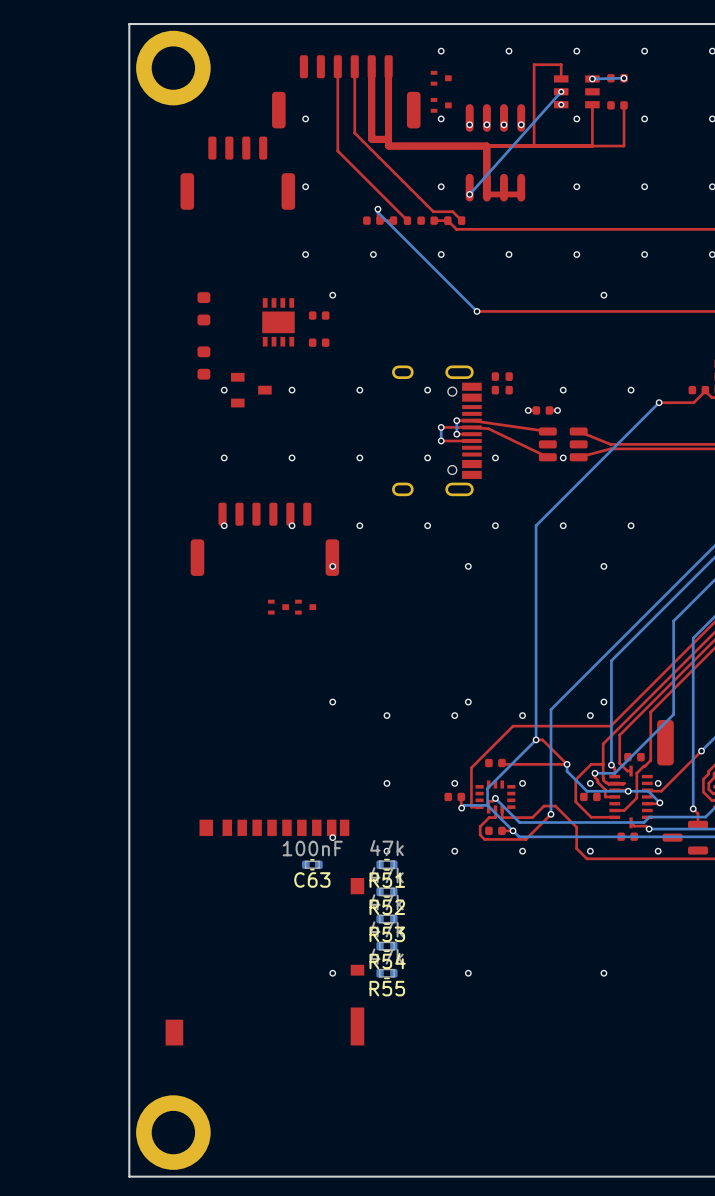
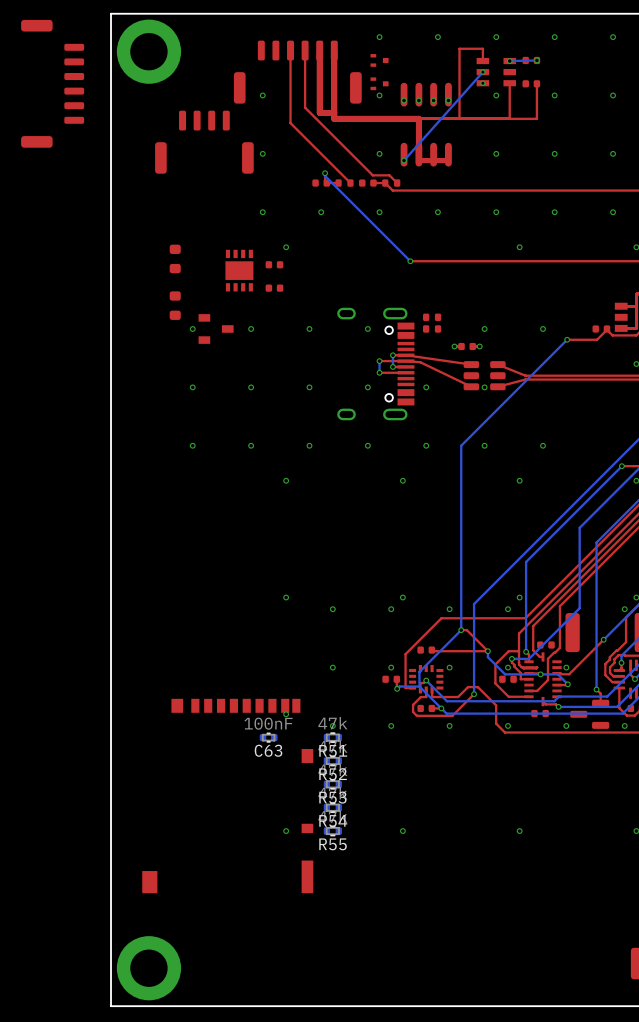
part: none -> (52, 83)
part: (264, 539) -> none
part: (278, 607) -> none
part: (305, 607) -> none

